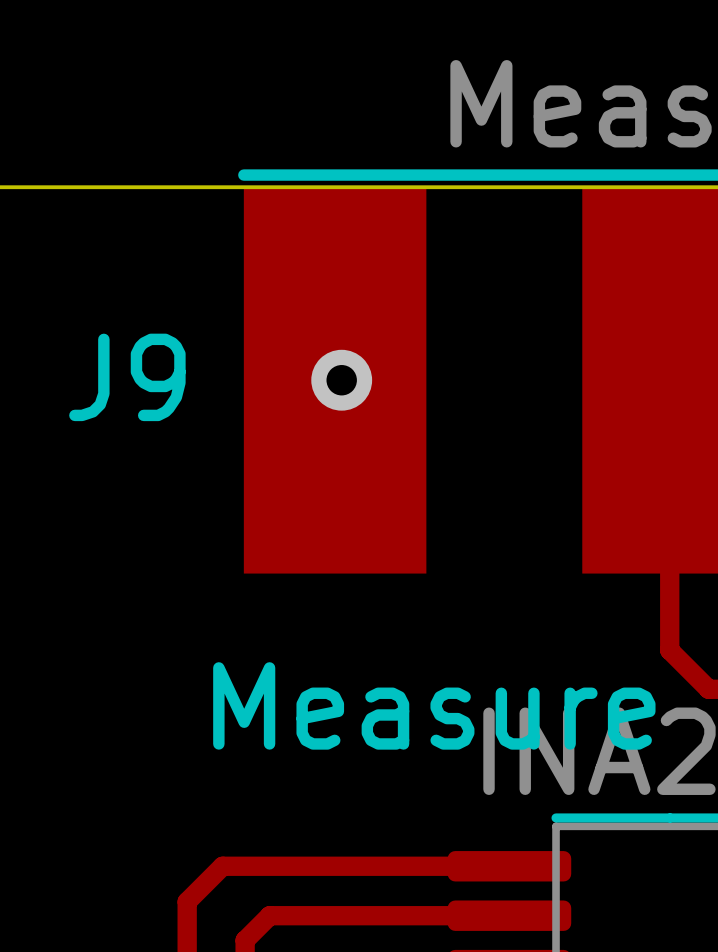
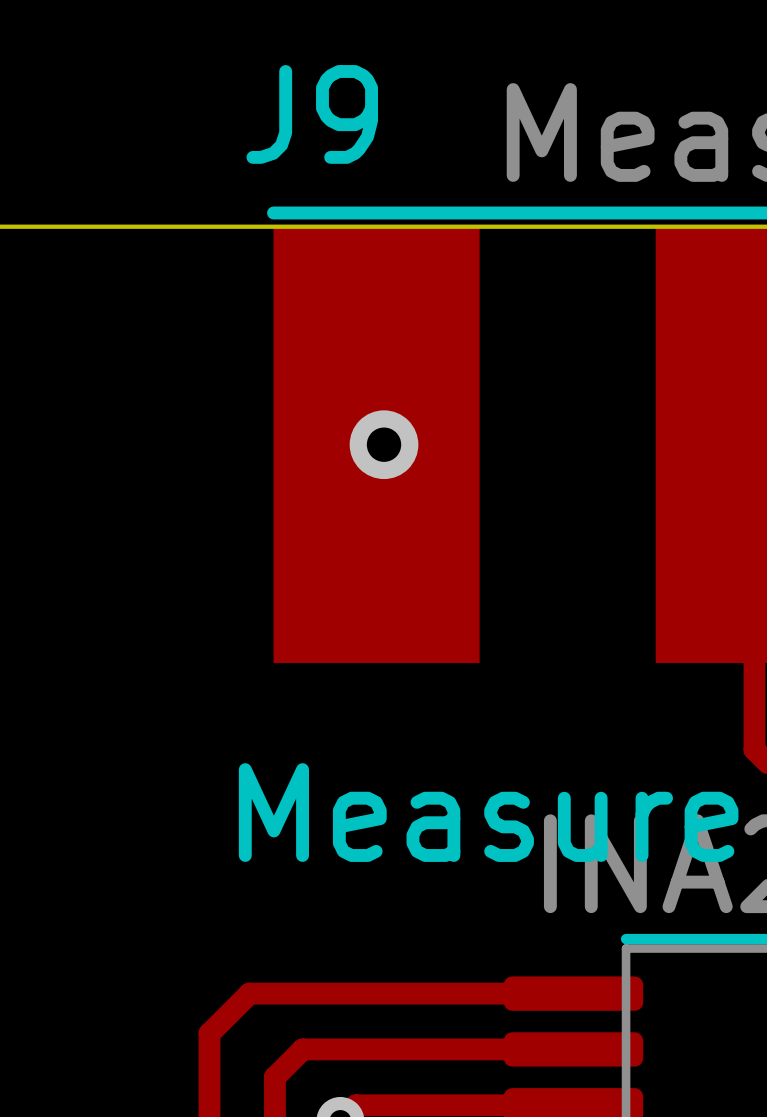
J9 name position: J9 (127, 377) -> J9 (312, 114)

